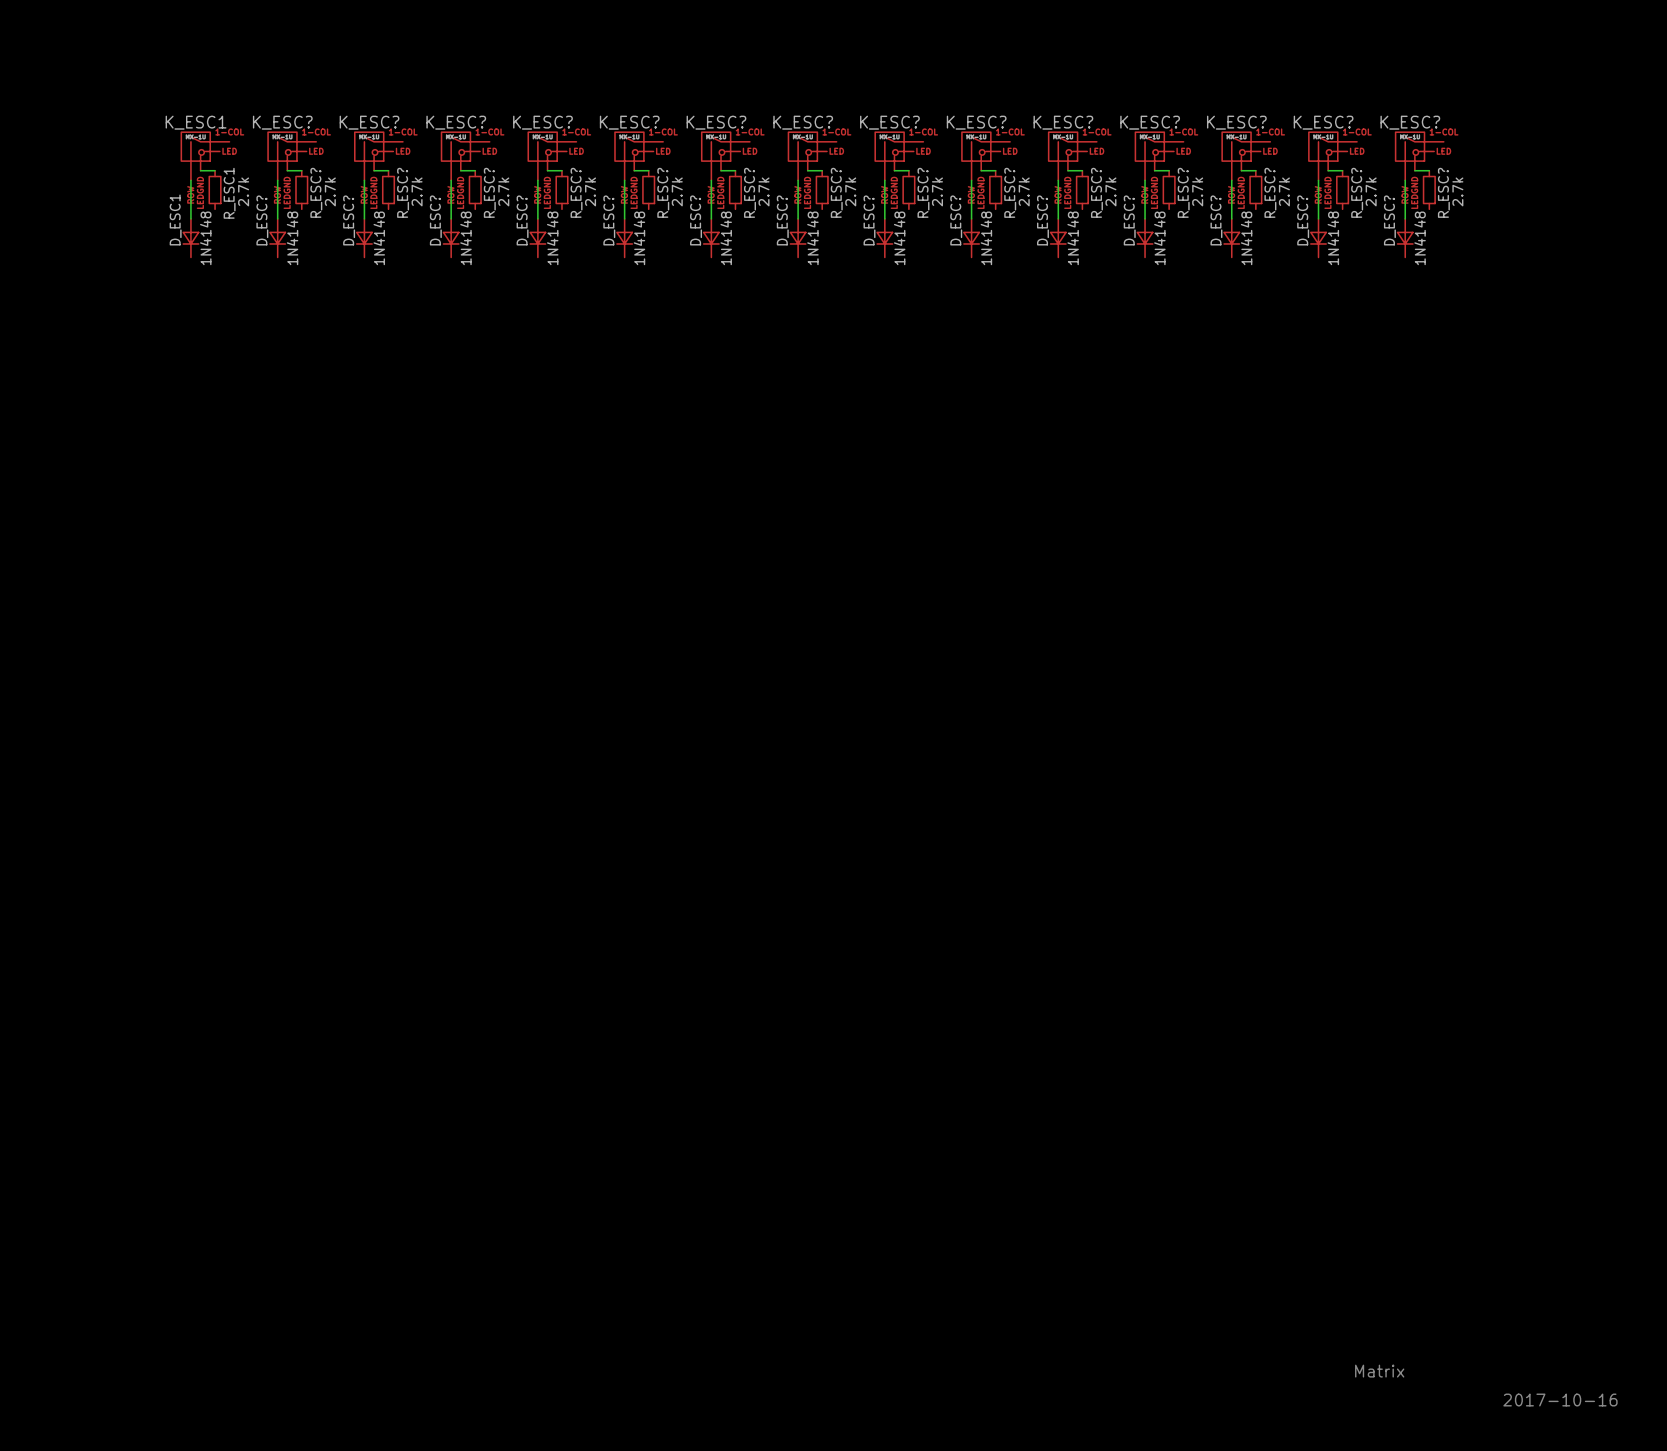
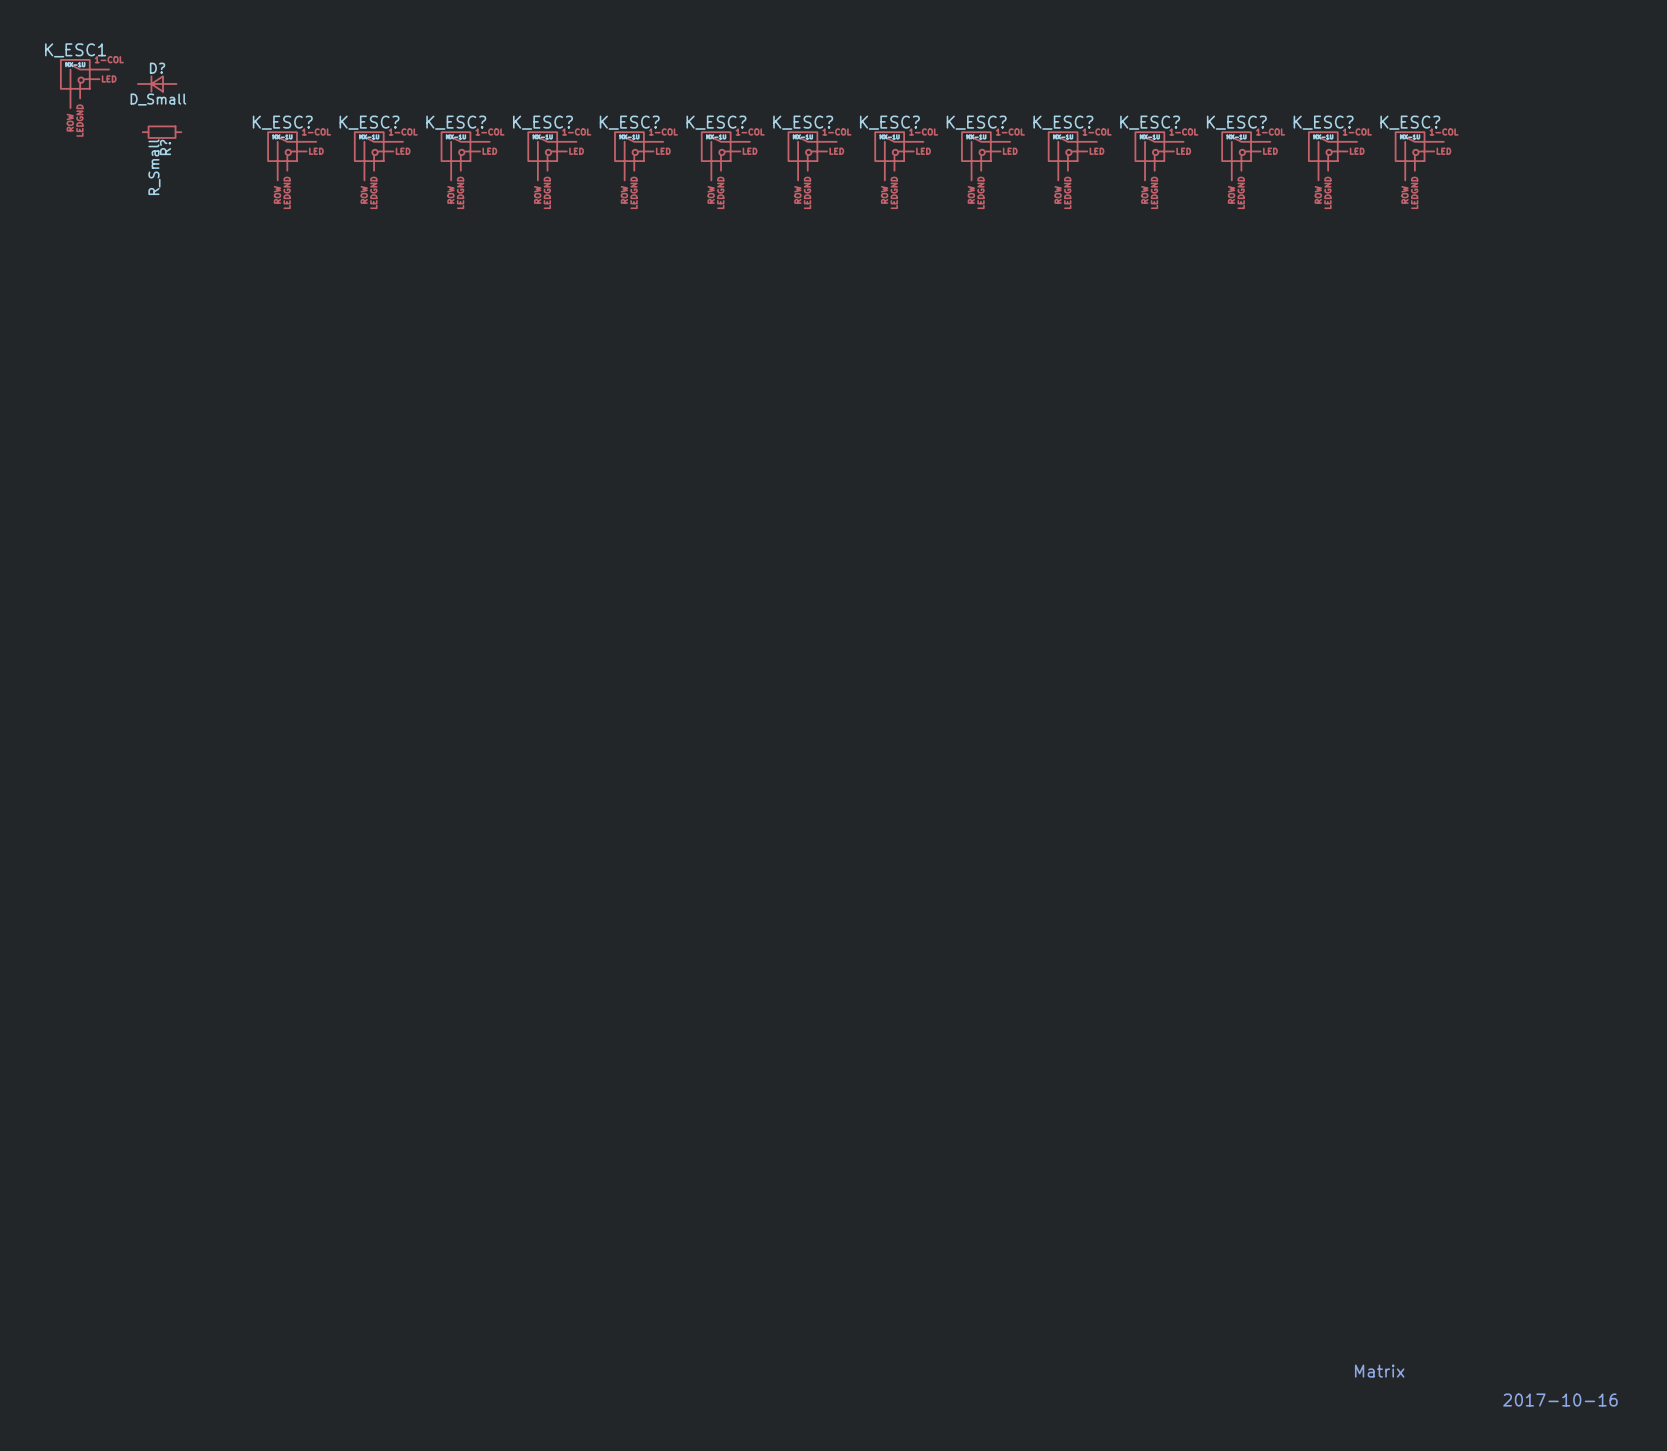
D?: none -> D_Small (157, 84)
R?: none -> R_Small (162, 132)
K_ESC1 position: (205, 156) -> (84, 83)
wire: (200, 170) (215, 170) -> none
wire: (287, 170) (301, 170) -> none
wire: (374, 170) (388, 170) -> none
wire: (460, 170) (475, 170) -> none
wire: (547, 170) (561, 170) -> none
wire: (634, 170) (648, 170) -> none
wire: (721, 170) (735, 170) -> none
wire: (807, 170) (822, 170) -> none
wire: (894, 170) (908, 170) -> none
wire: (981, 170) (995, 170) -> none
wire: (1067, 170) (1082, 170) -> none
wire: (1154, 170) (1169, 170) -> none
wire: (1241, 170) (1255, 170) -> none
wire: (1328, 170) (1342, 170) -> none
wire: (1414, 170) (1429, 170) -> none
wire: (190, 180) (190, 218) -> none
wire: (277, 180) (277, 218) -> none
wire: (364, 180) (364, 218) -> none
wire: (451, 180) (451, 218) -> none
wire: (537, 180) (537, 218) -> none
wire: (624, 180) (624, 218) -> none
wire: (711, 180) (711, 218) -> none
wire: (798, 180) (798, 218) -> none
wire: (884, 180) (884, 218) -> none
wire: (971, 180) (971, 218) -> none
wire: (1058, 180) (1058, 218) -> none
wire: (1145, 180) (1145, 218) -> none
wire: (1231, 180) (1231, 218) -> none
wire: (1318, 180) (1318, 218) -> none
wire: (1405, 180) (1405, 218) -> none
R_ESC1: 2.7k (215, 190) -> none
R_ESC?: 2.7k (301, 190) -> none
R_ESC?: 2.7k (388, 190) -> none
R_ESC?: 2.7k (475, 190) -> none
R_ESC?: 2.7k (561, 190) -> none
R_ESC?: 2.7k (648, 190) -> none
R_ESC?: 2.7k (735, 190) -> none
R_ESC?: 2.7k (822, 190) -> none
R_ESC?: 2.7k (908, 190) -> none
R_ESC?: 2.7k (995, 190) -> none
R_ESC?: 2.7k (1082, 190) -> none
R_ESC?: 2.7k (1169, 190) -> none
R_ESC?: 2.7k (1255, 190) -> none
R_ESC?: 2.7k (1342, 190) -> none
R_ESC?: 2.7k (1429, 190) -> none
D_ESC1: 1N4148 (190, 238) -> none
D_ESC?: 1N4148 (277, 238) -> none
D_ESC?: 1N4148 (364, 238) -> none
D_ESC?: 1N4148 (451, 238) -> none
D_ESC?: 1N4148 (537, 238) -> none
D_ESC?: 1N4148 (624, 238) -> none
D_ESC?: 1N4148 (711, 238) -> none
D_ESC?: 1N4148 (798, 238) -> none
D_ESC?: 1N4148 (884, 238) -> none
D_ESC?: 1N4148 (971, 238) -> none
D_ESC?: 1N4148 (1058, 238) -> none
D_ESC?: 1N4148 (1145, 238) -> none
D_ESC?: 1N4148 (1231, 238) -> none
D_ESC?: 1N4148 (1318, 238) -> none
D_ESC?: 1N4148 (1405, 238) -> none

